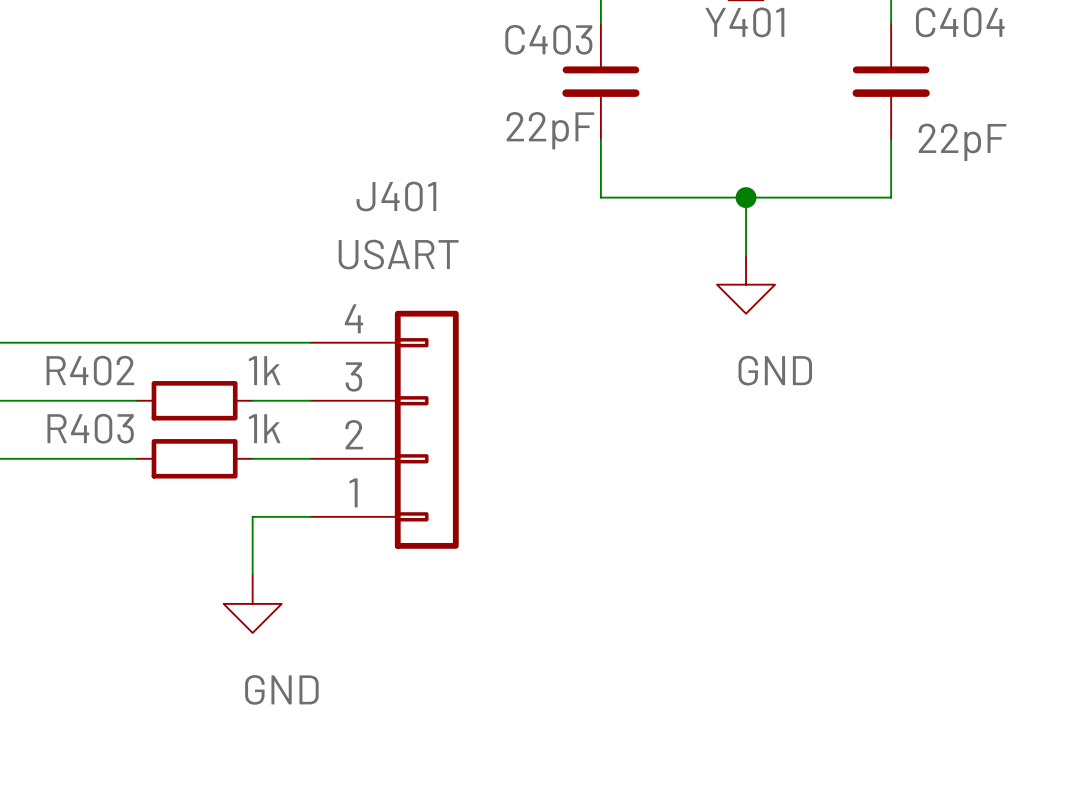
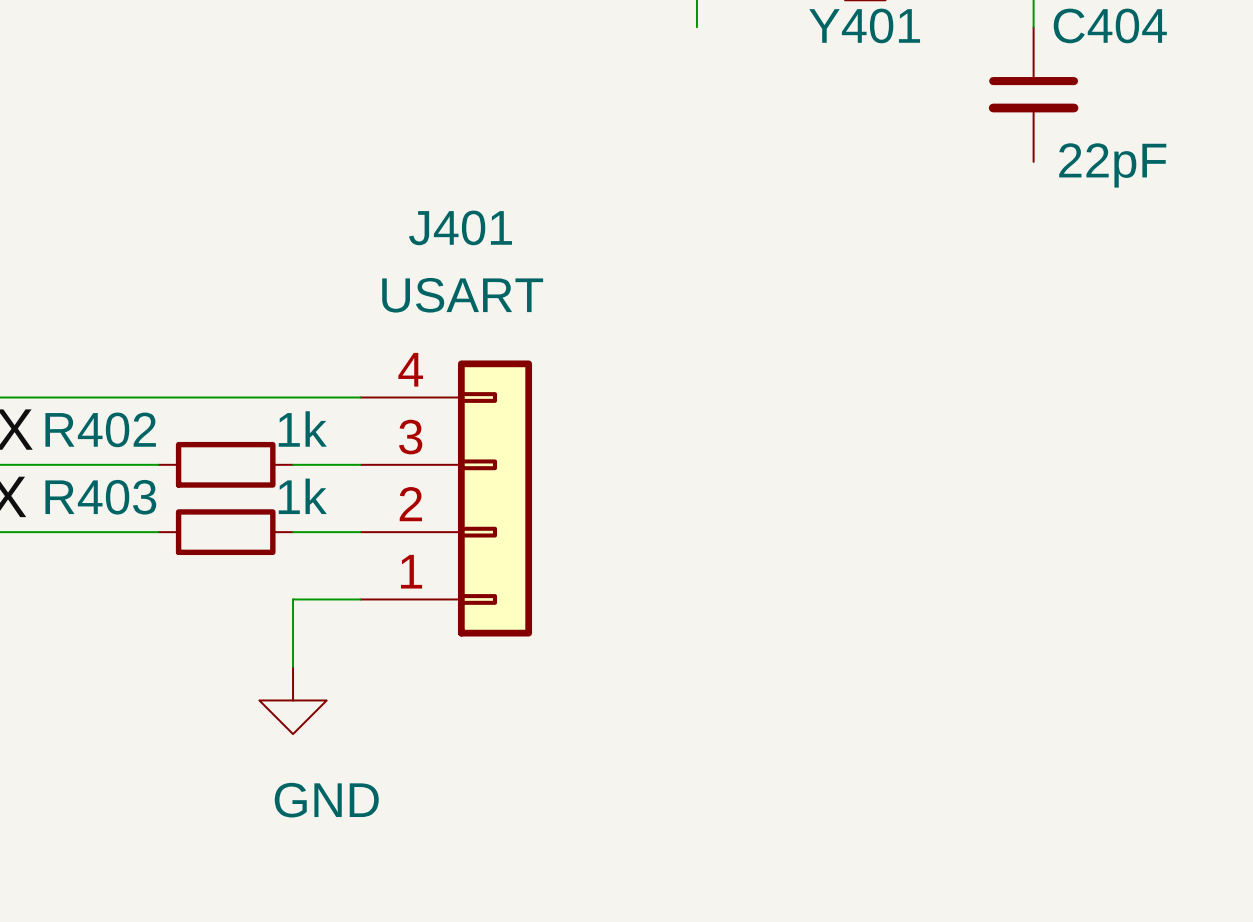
C403: 22pF (600, 81) -> none
wire: (600, 139) (600, 197) (891, 197) (891, 139) -> none
wire: (746, 197) (746, 255) -> none
junction: (746, 197) -> none
power symbol: GND (746, 284) -> none

